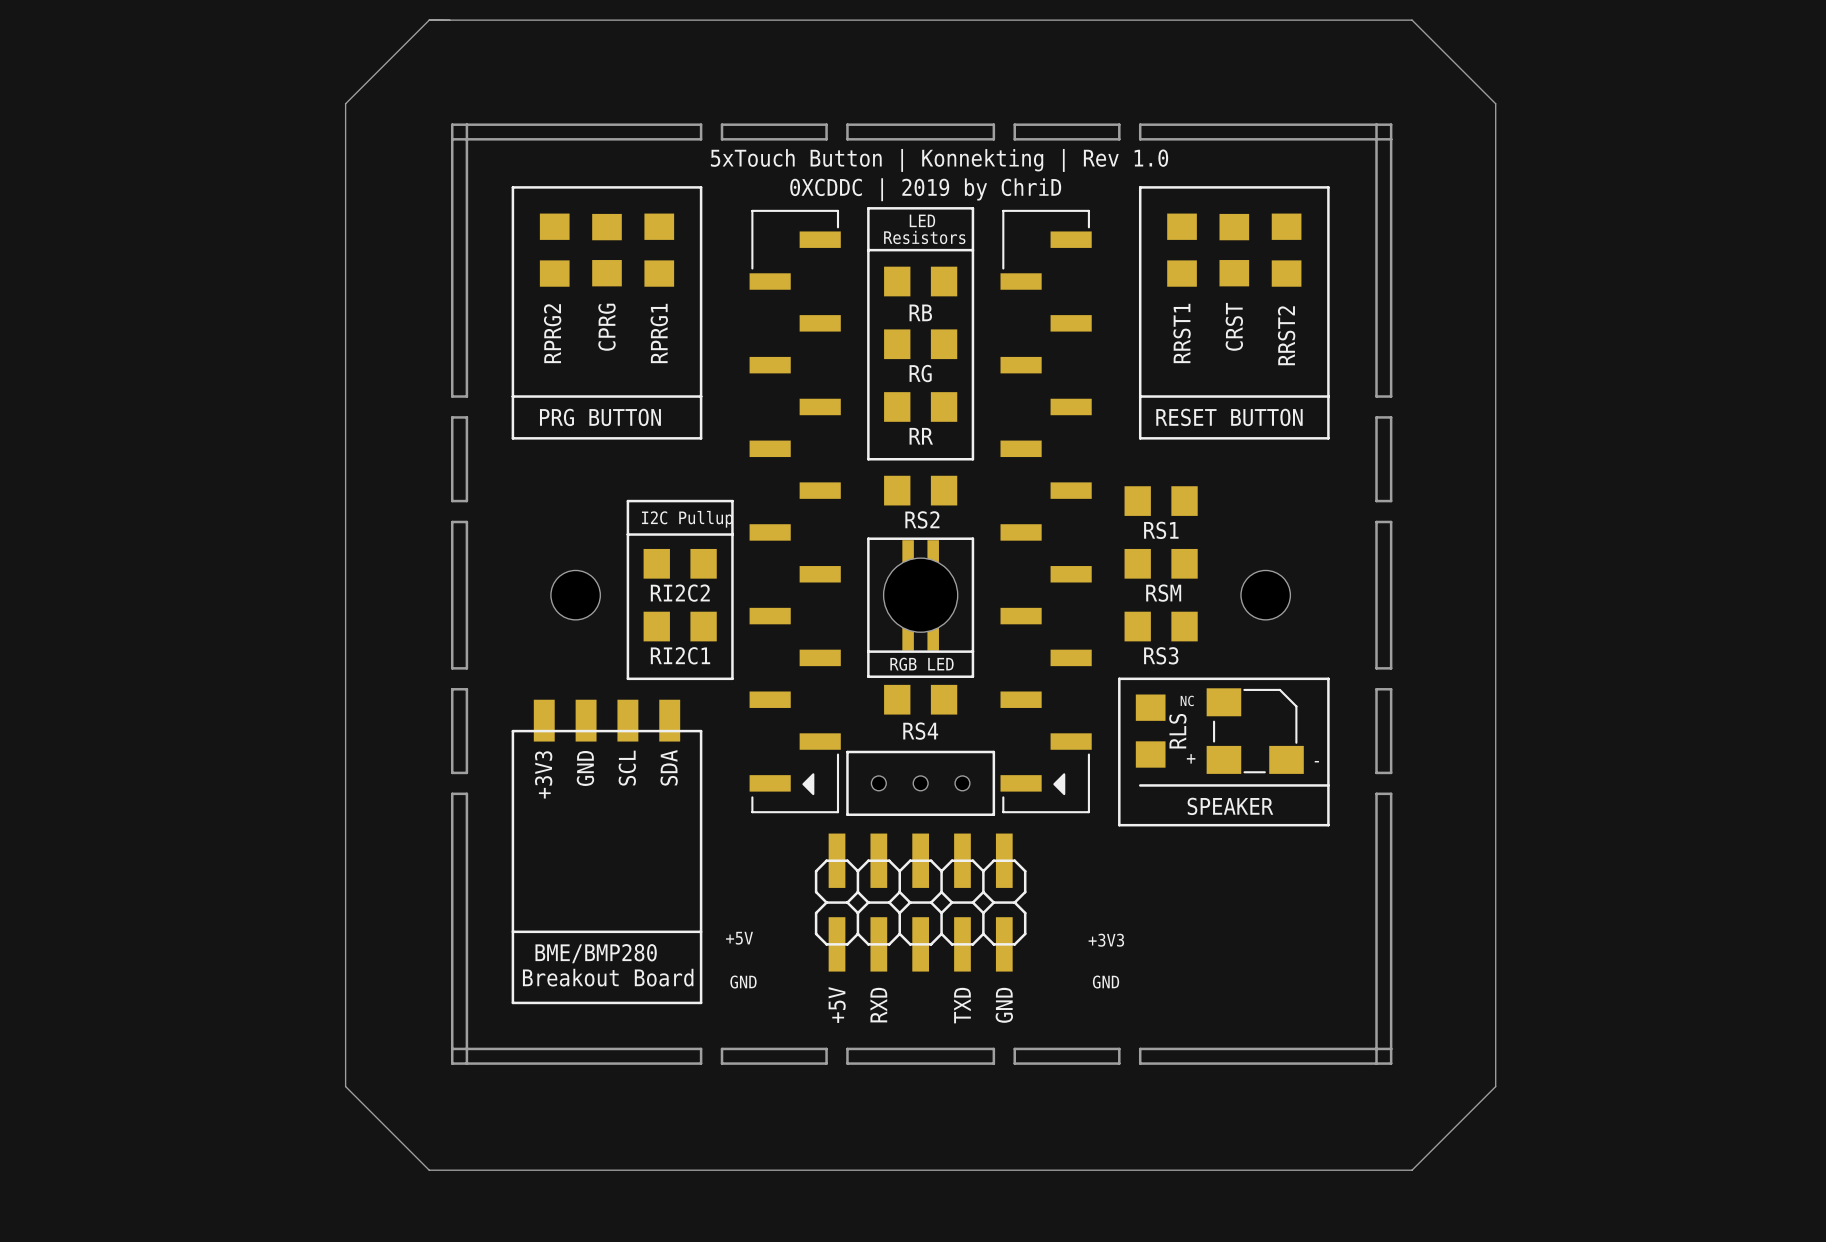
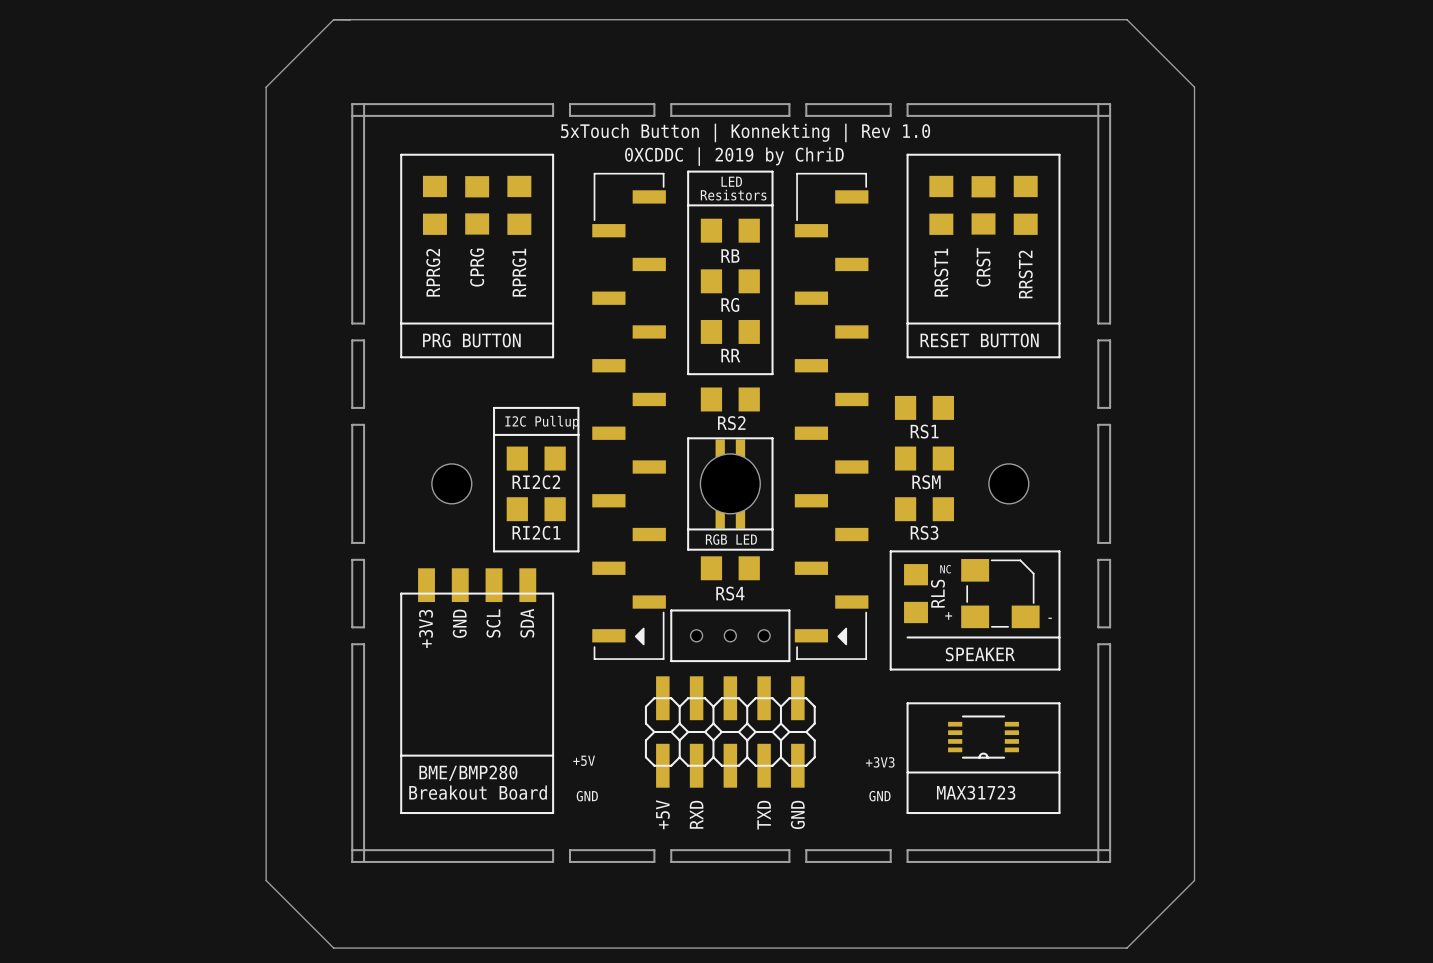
line: none -> (907, 703) (1059, 703) (1059, 813) (907, 813) (907, 703)
part: none -> (983, 737)
line: none -> (907, 772) (1059, 772)
text: none -> MAX31723 (976, 792)

